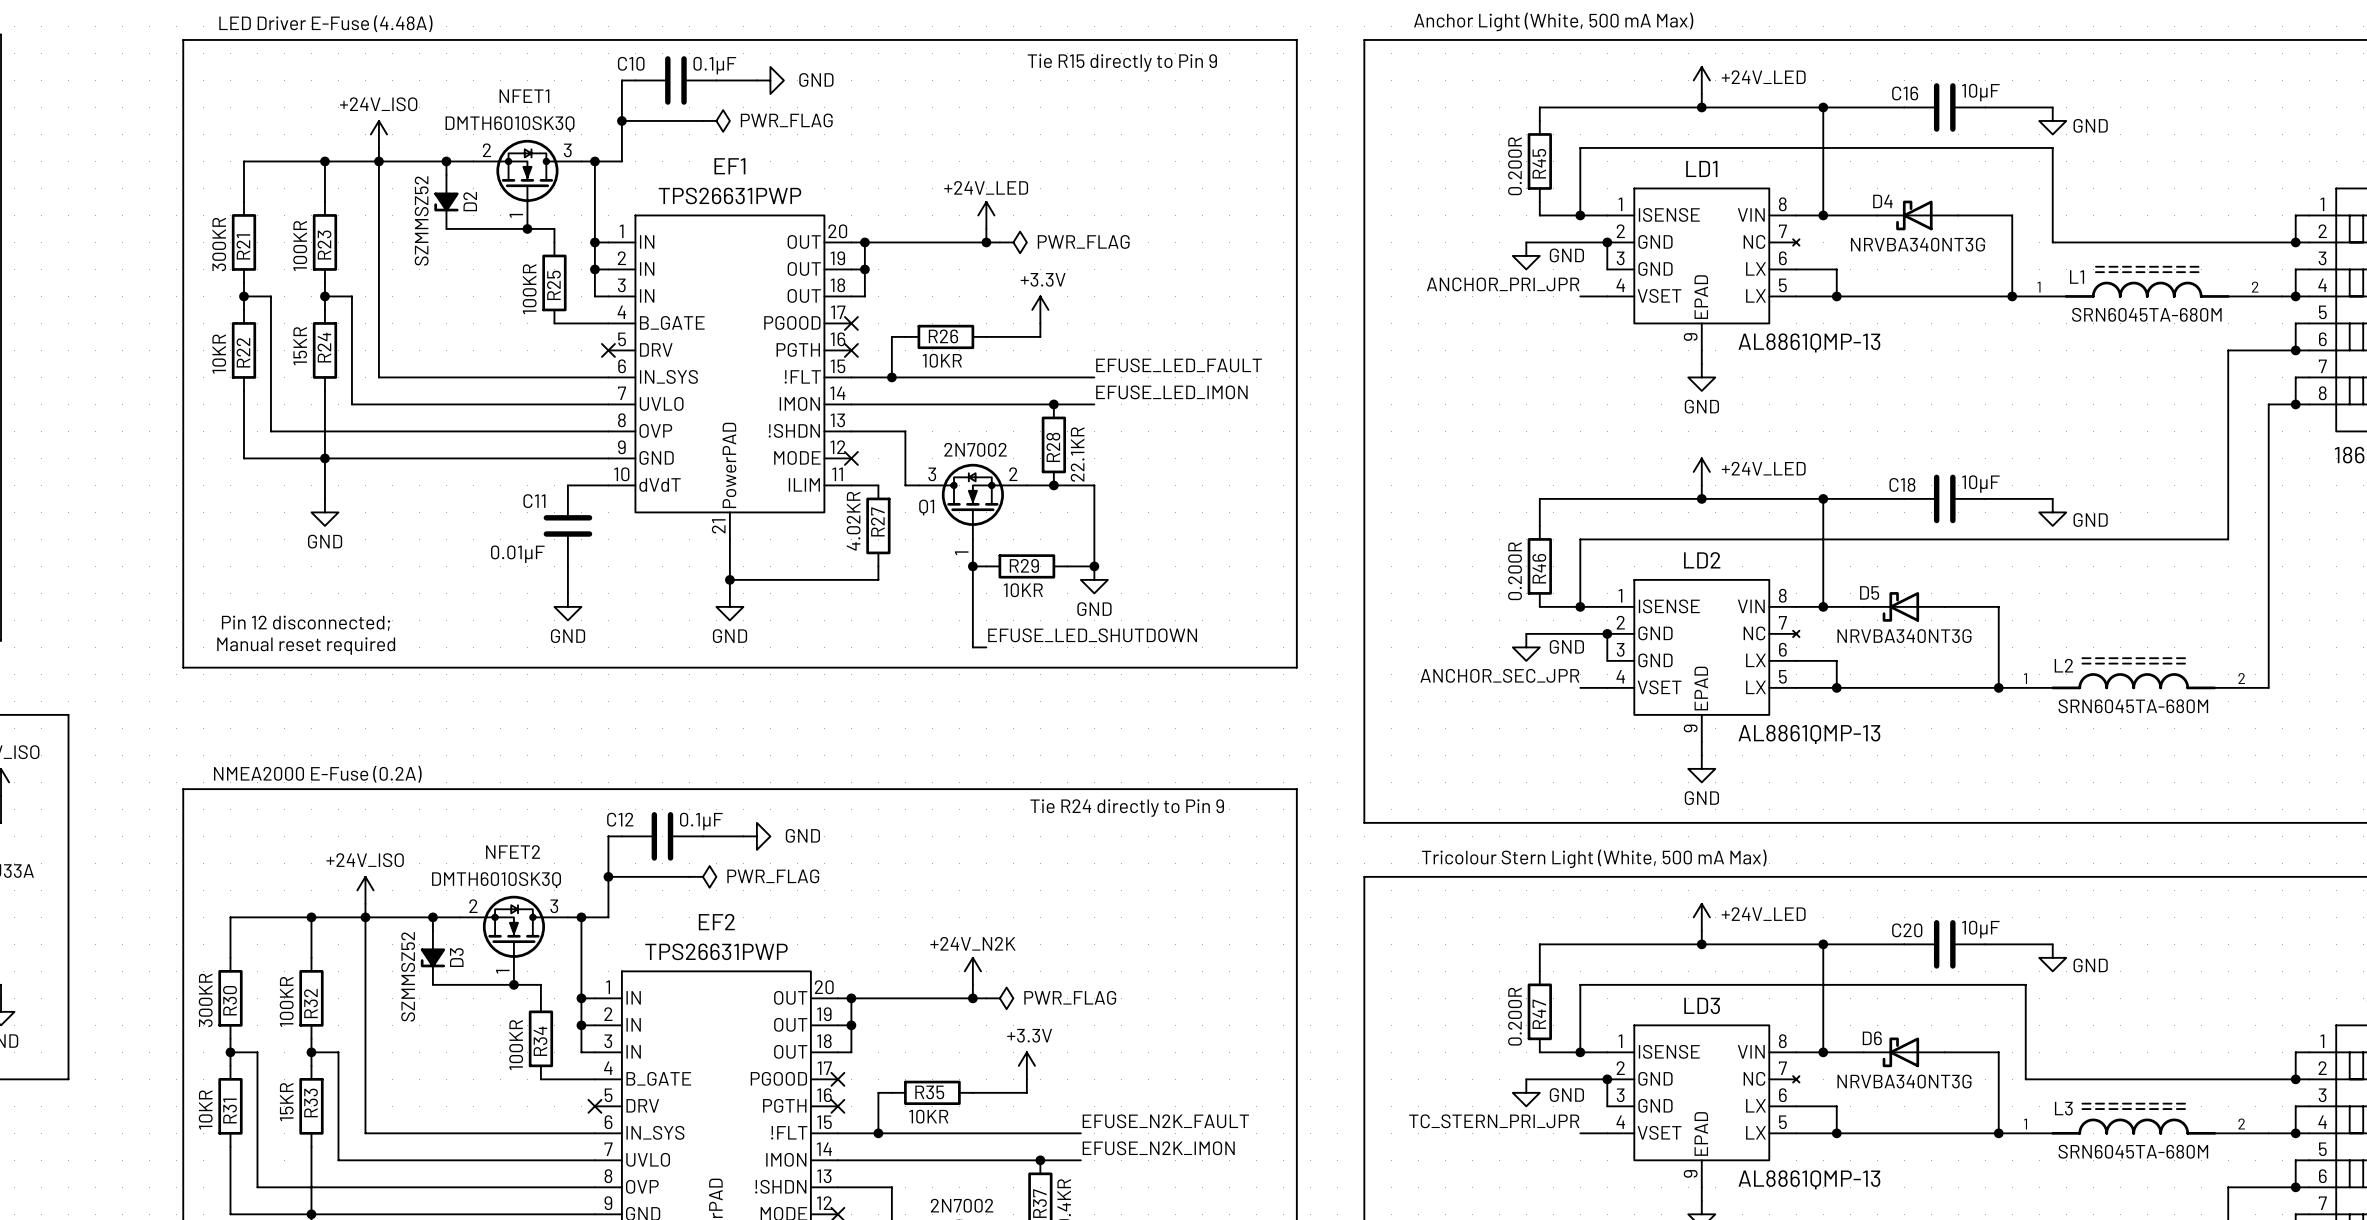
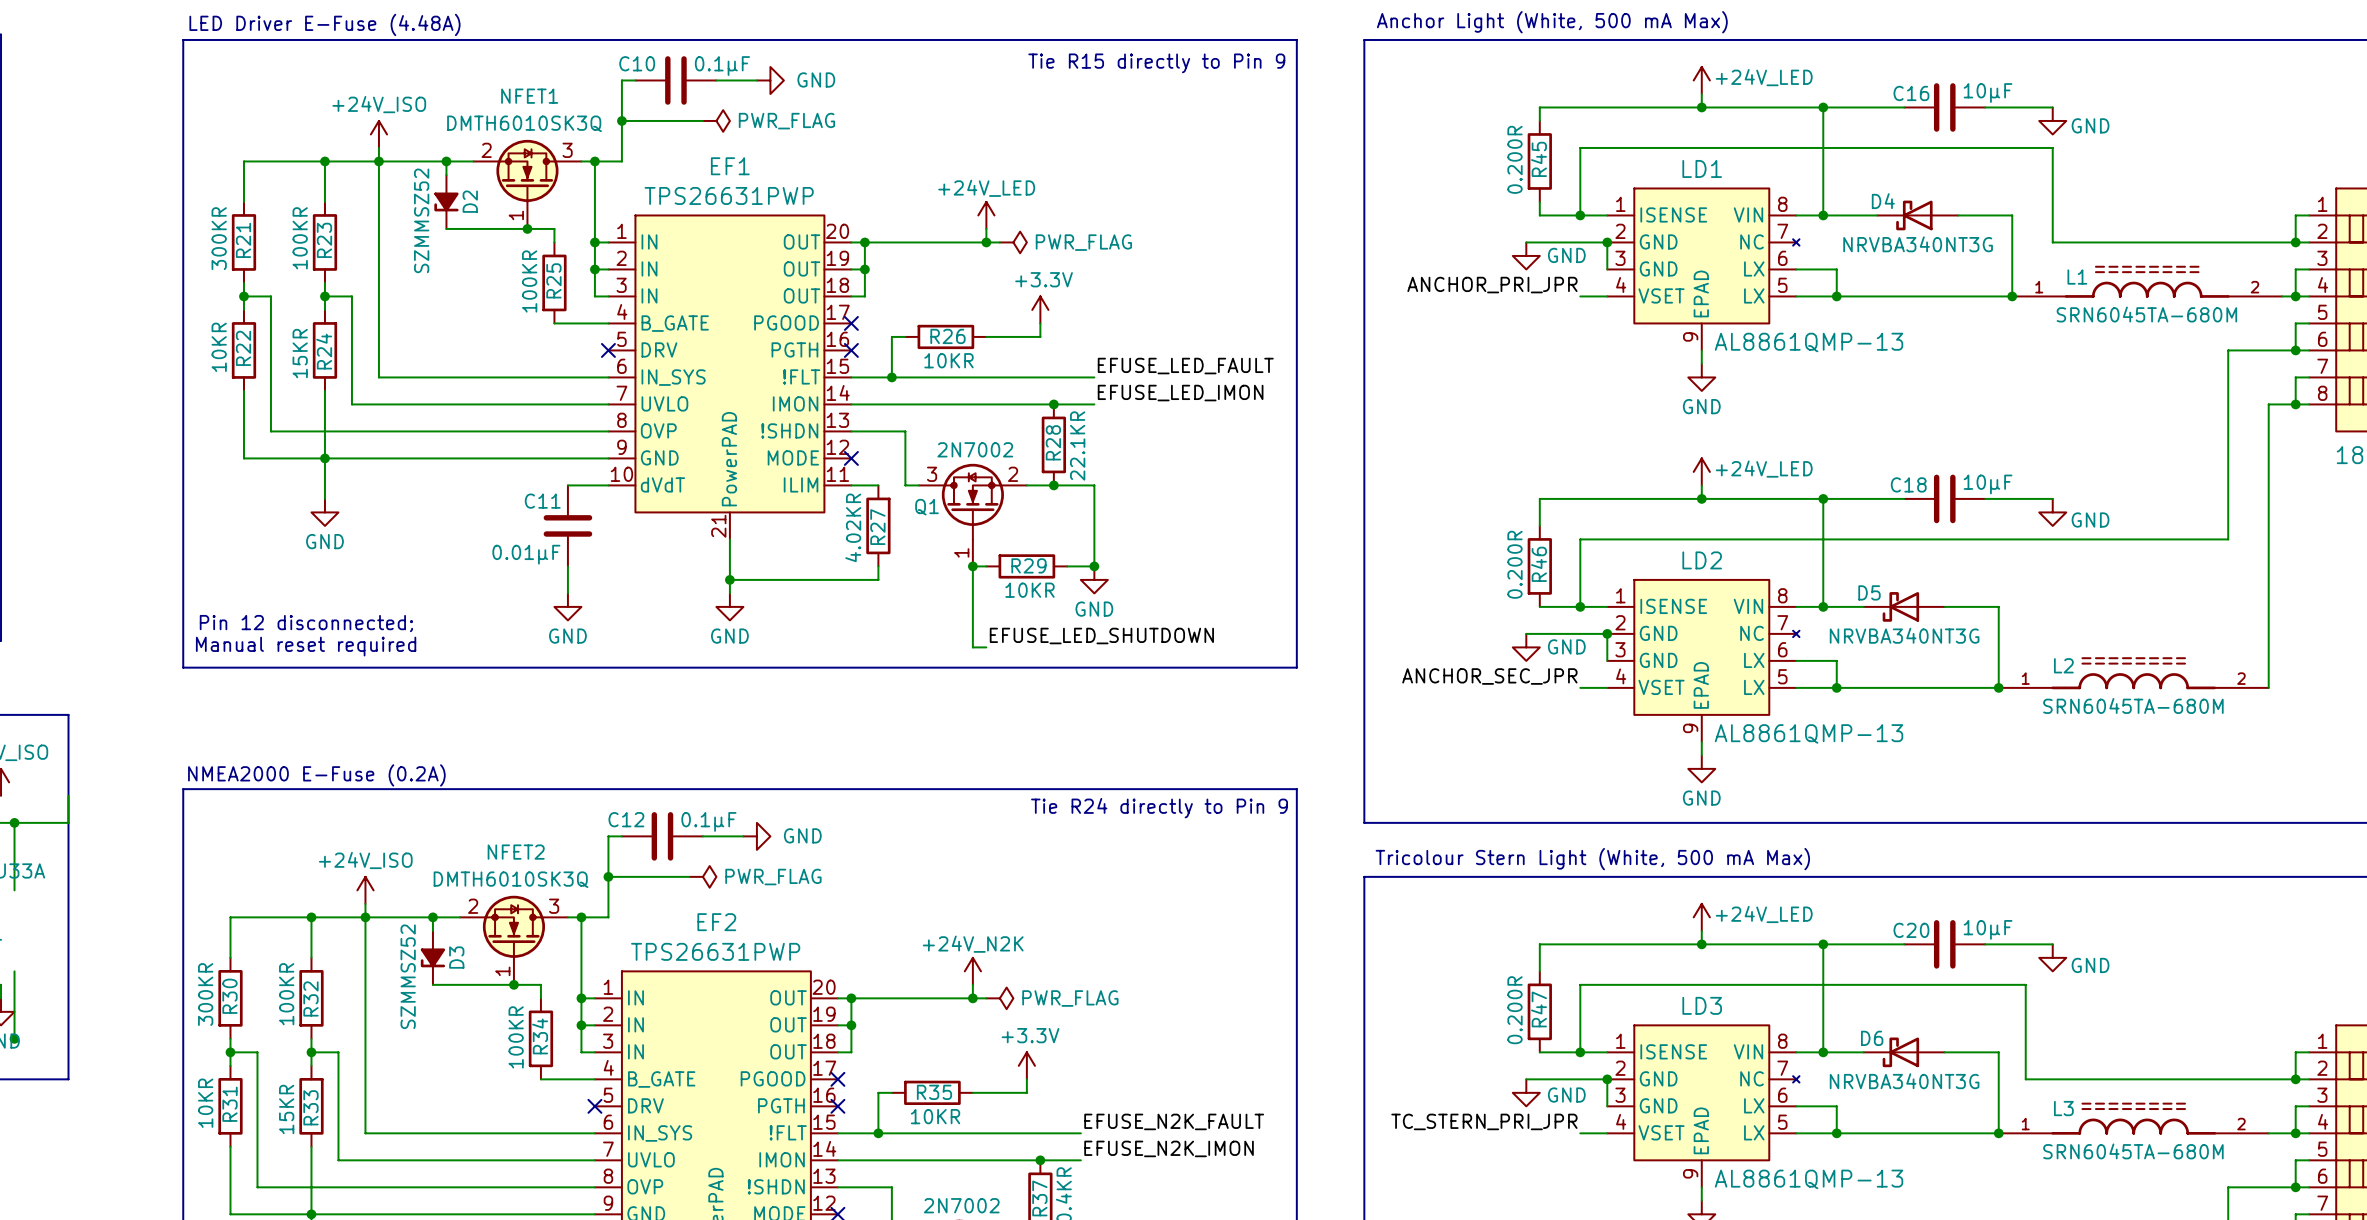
wire: (1, 795) (1, 822) -> (68, 795) (68, 822) (1, 822)
wire: none -> (14, 822) (14, 890)
junction: none -> (14, 822)
wire: none -> (14, 971) (14, 1038)
junction: none -> (14, 1038)

